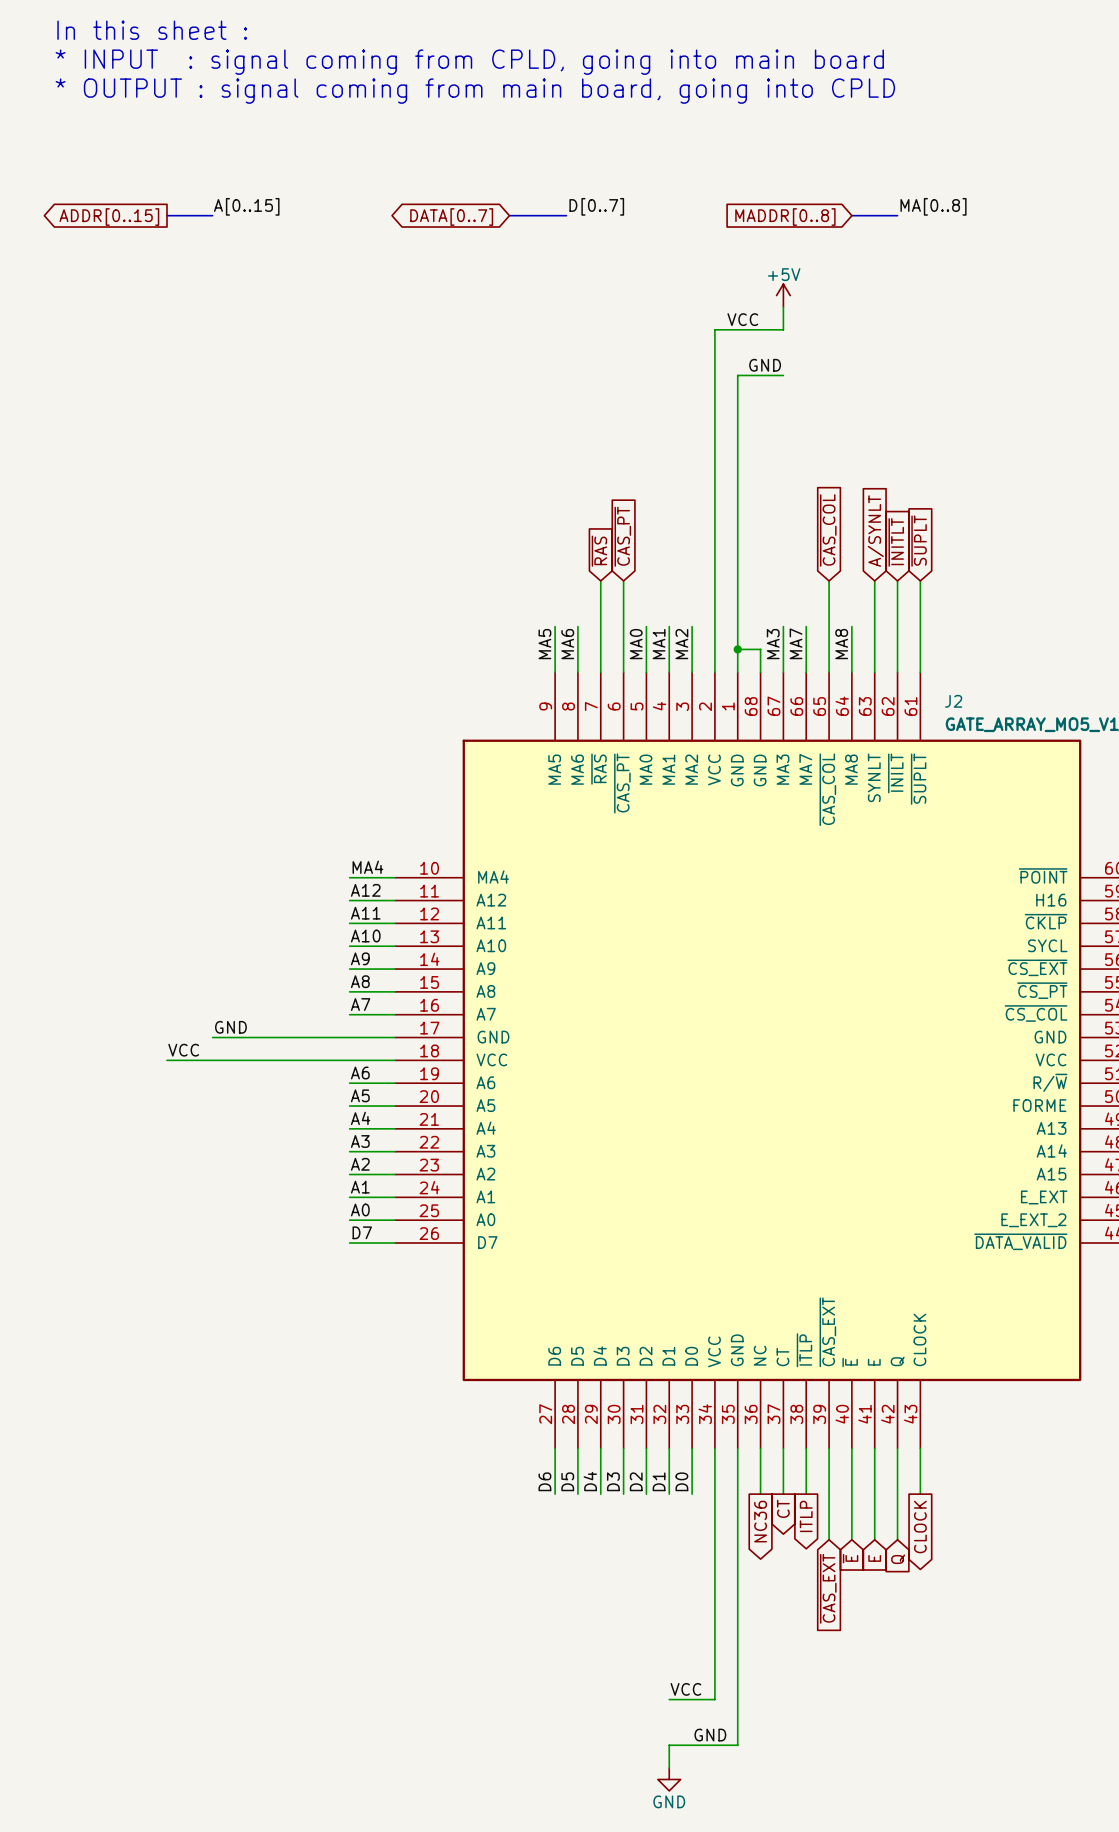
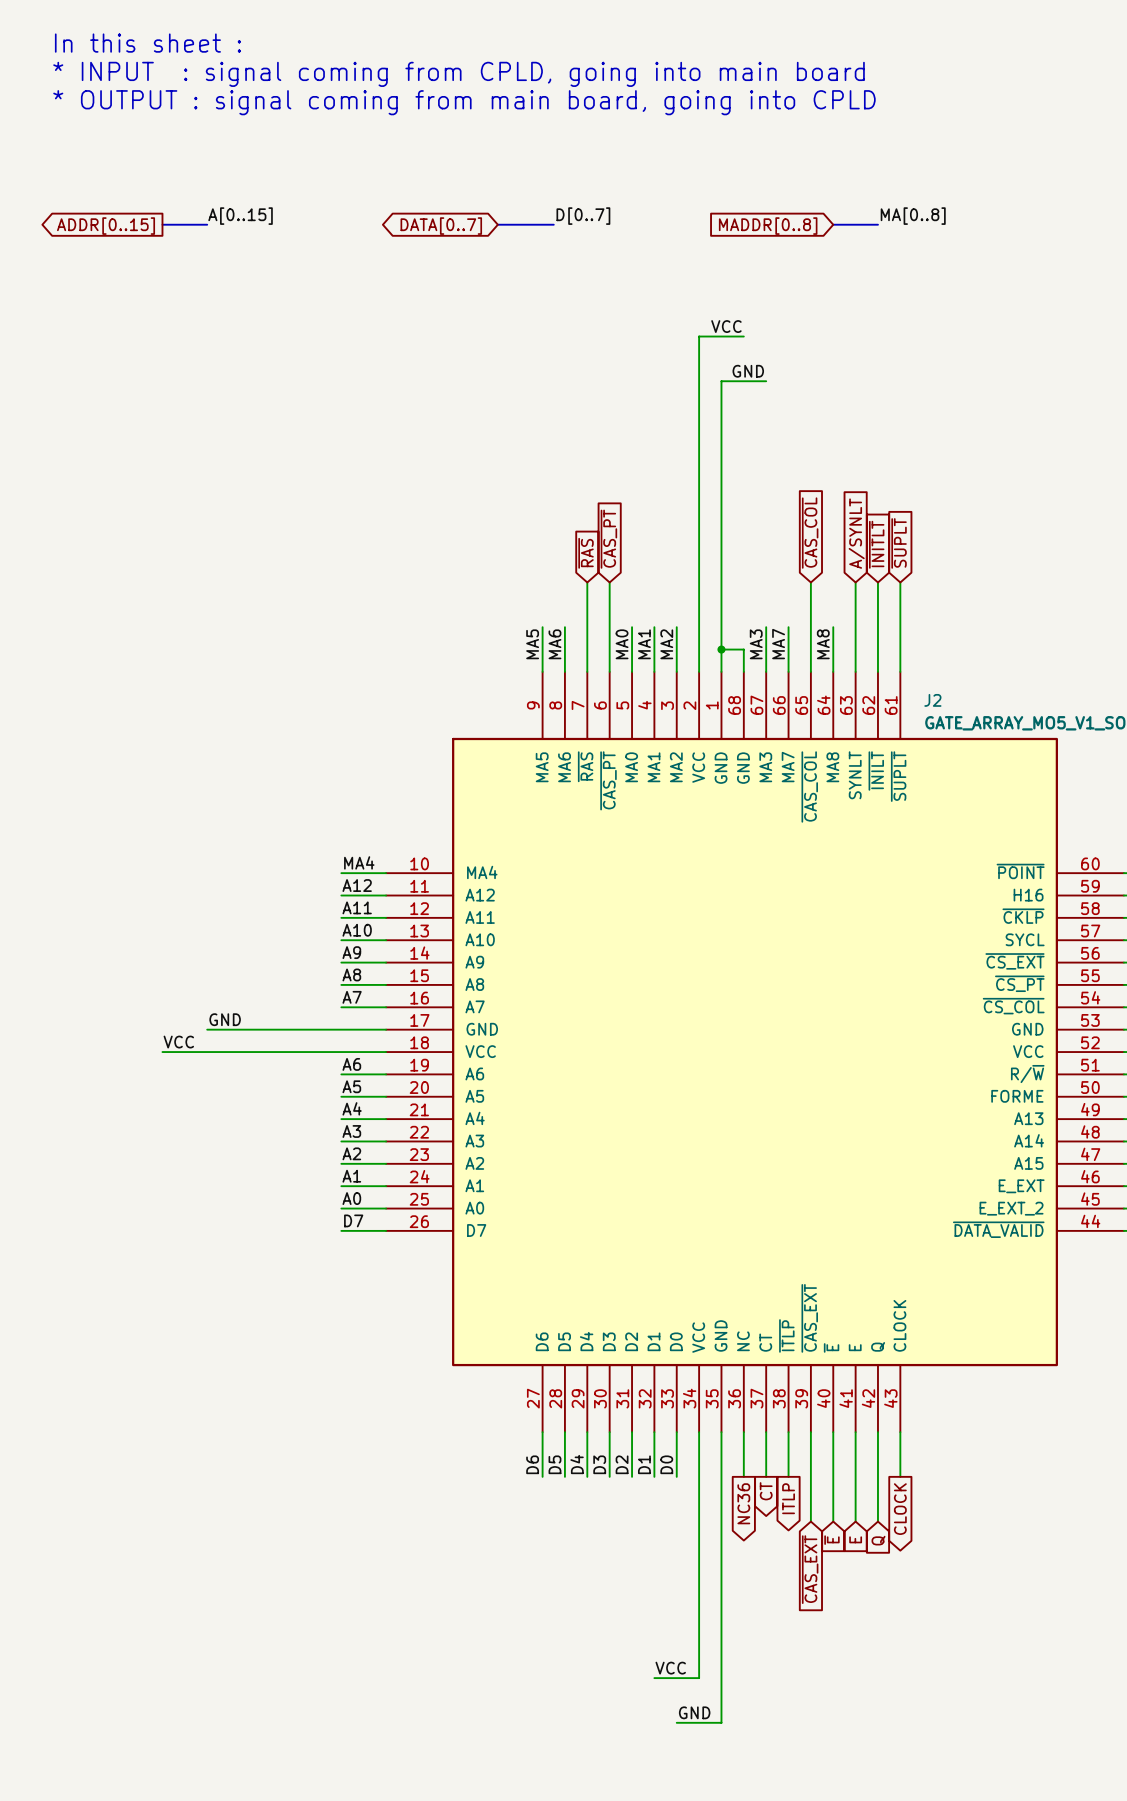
power symbol: +5V (783, 295) -> none
wire: (783, 306) (783, 329) (760, 329) -> none
wire: (692, 1745) (669, 1745) (669, 1768) -> none
power symbol: GND (669, 1779) -> none

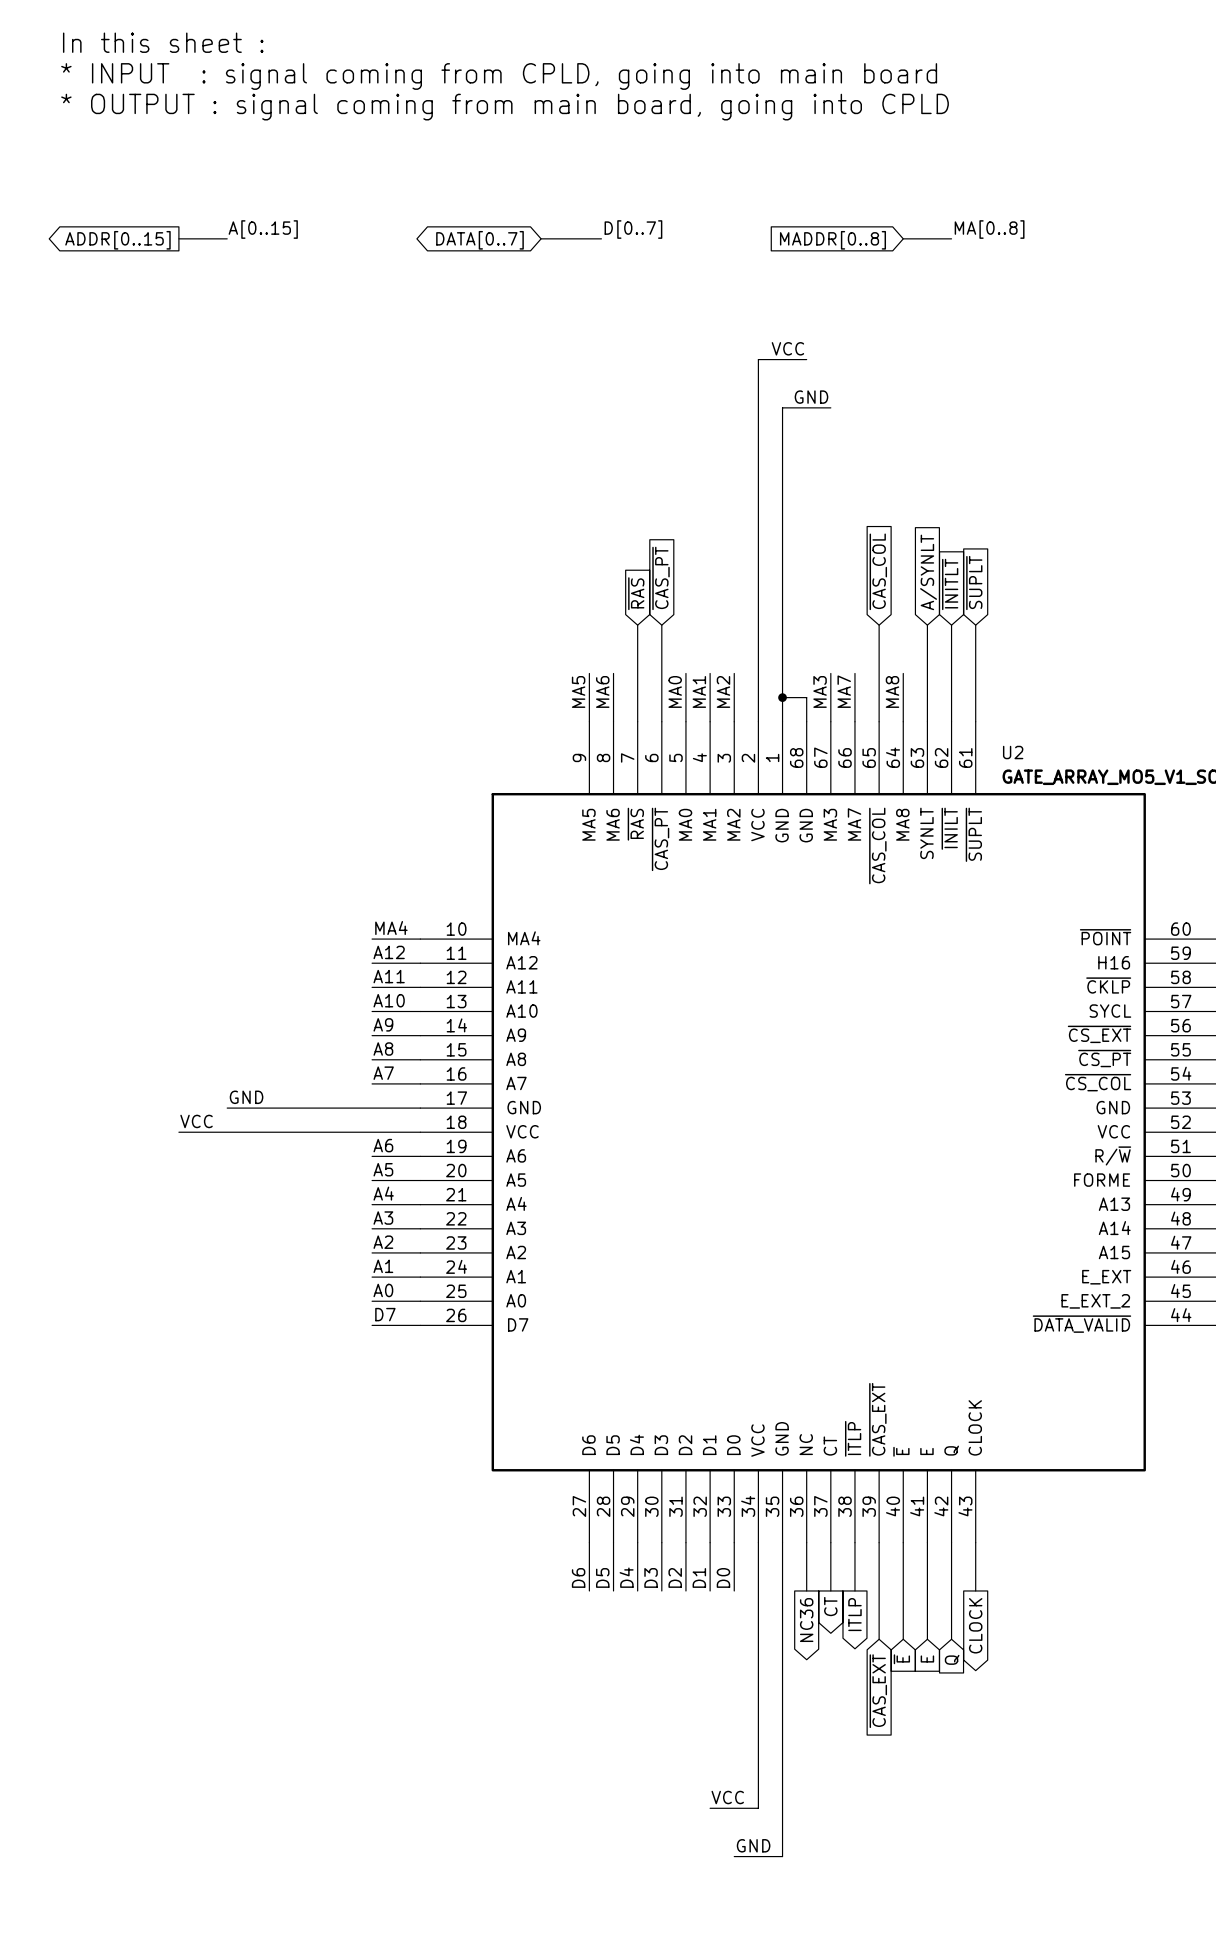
J2 name: J2 (932, 700) -> U2 (1013, 752)

